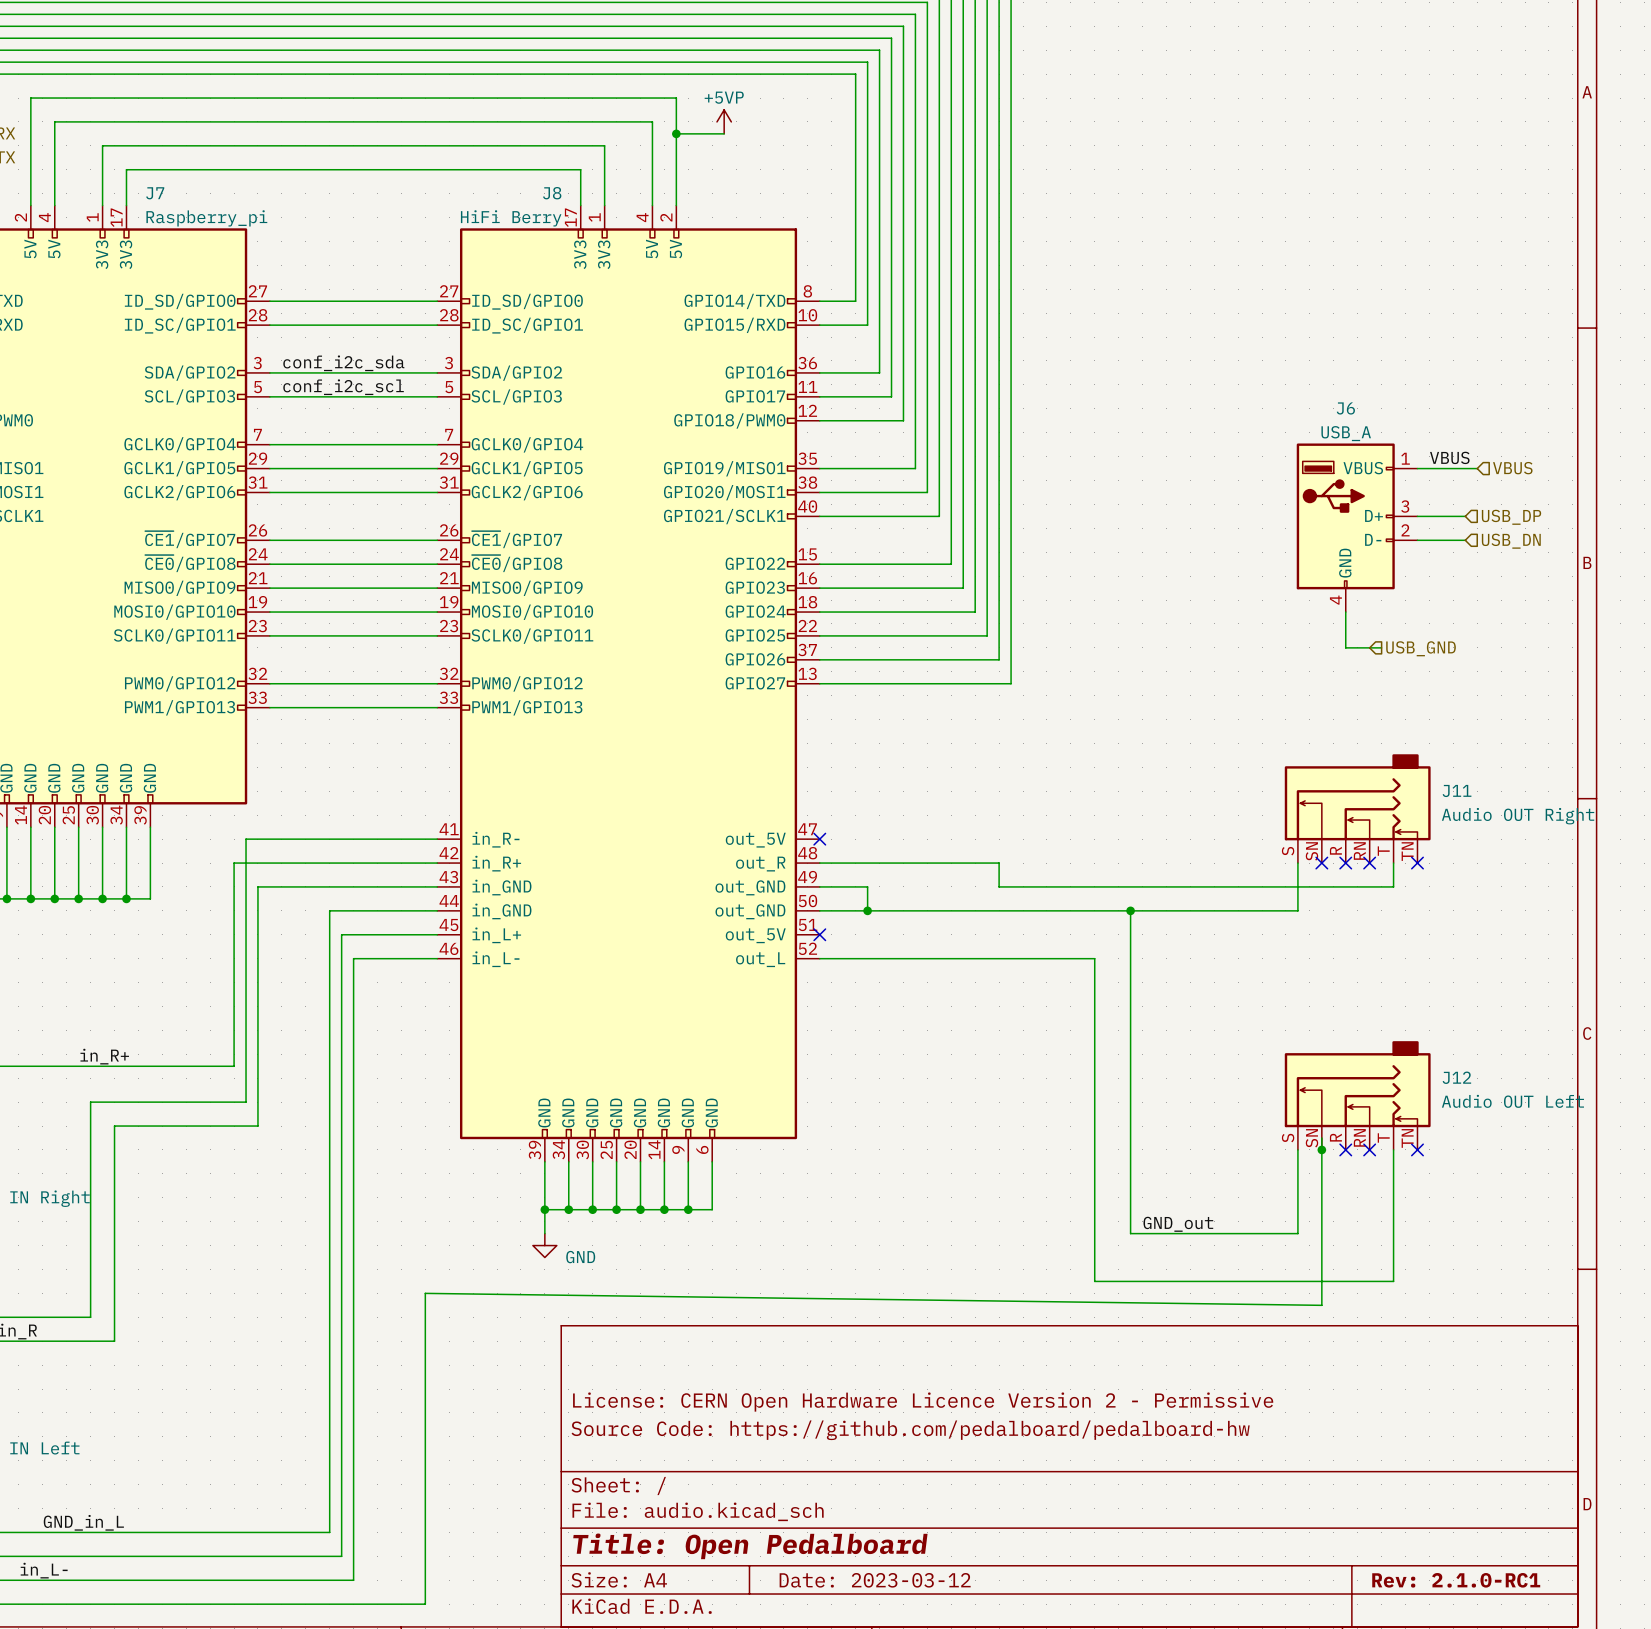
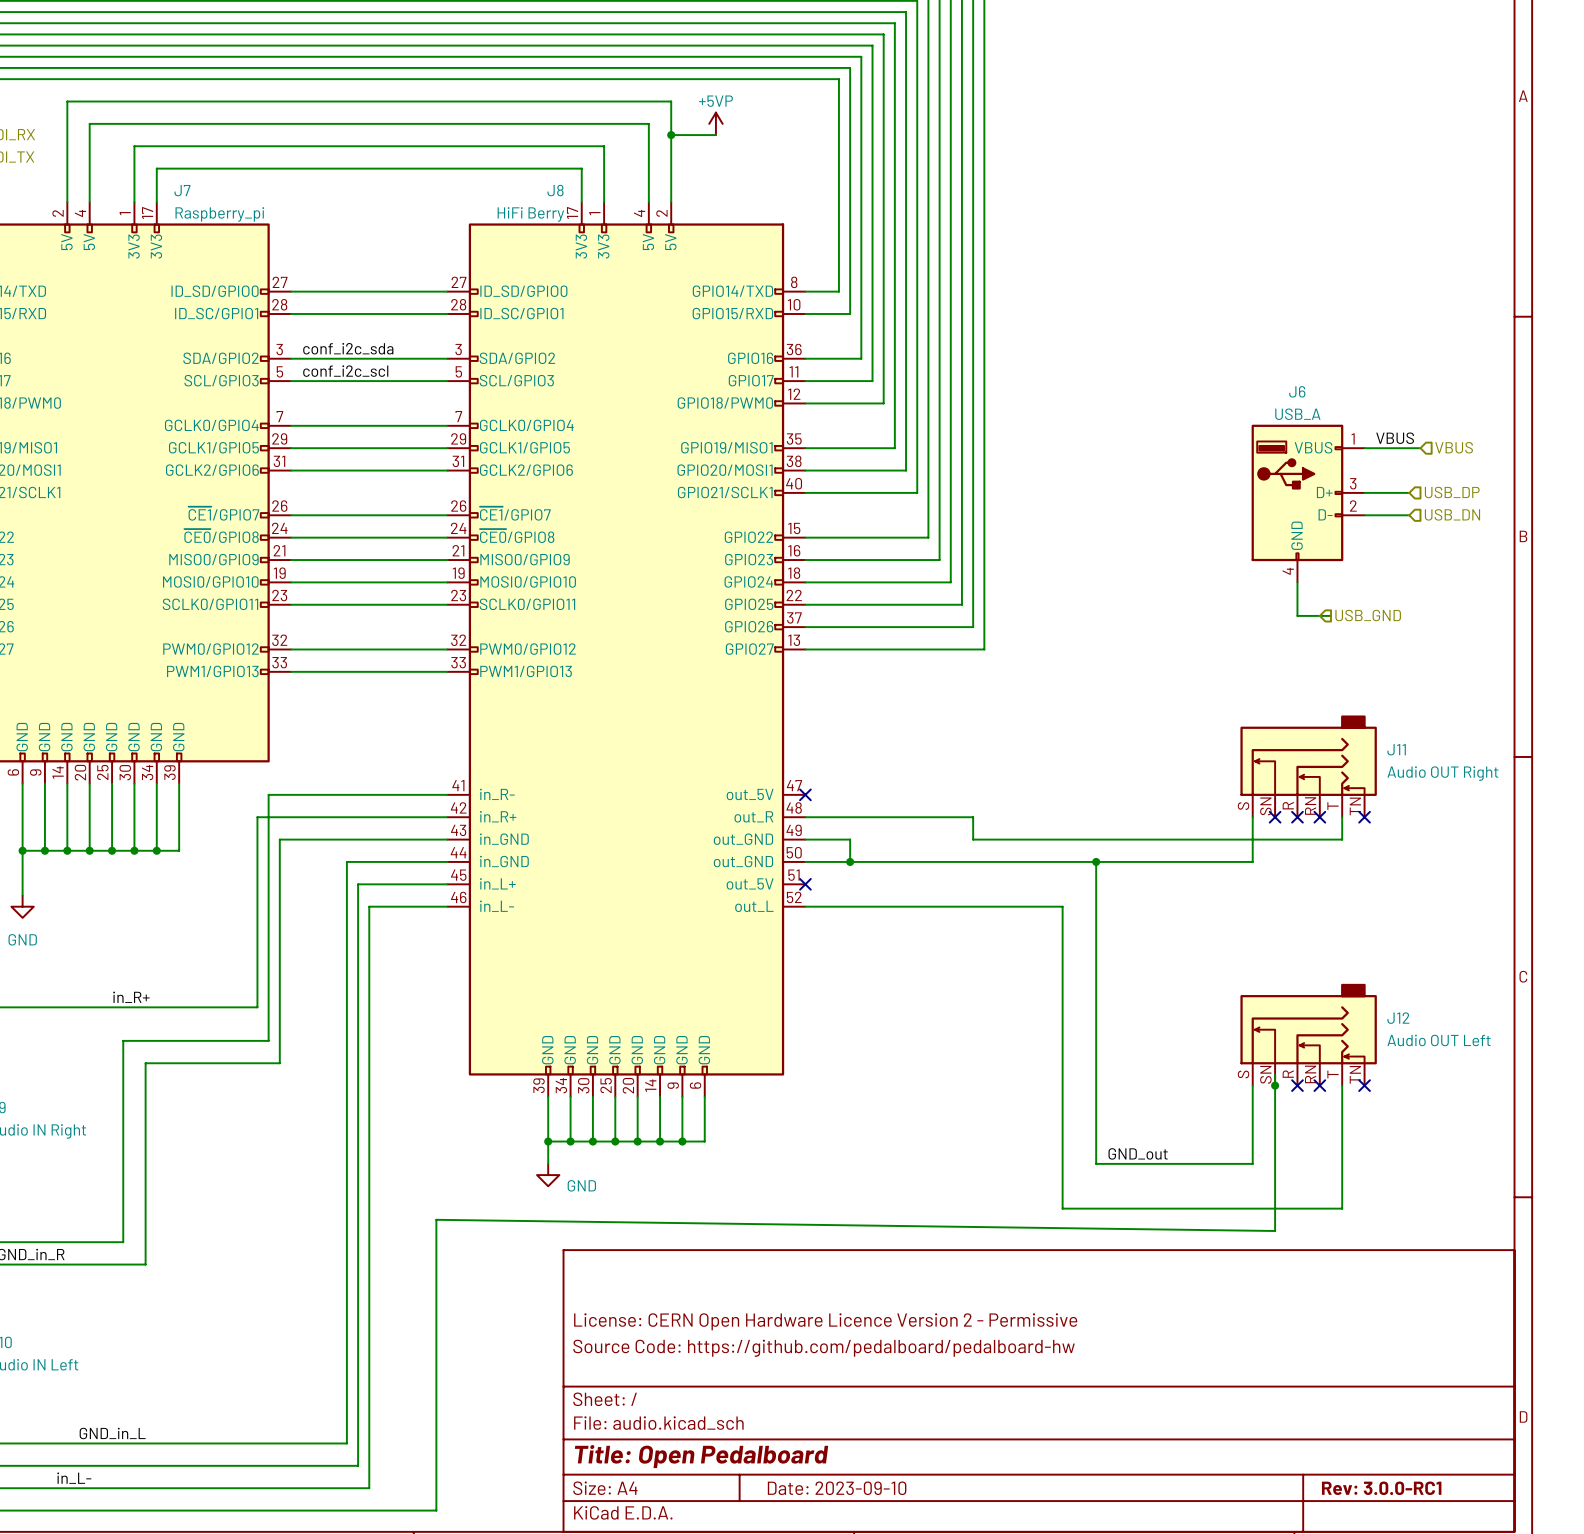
title block: Date: 2023-03-12 (875, 1580) -> Date: 2023-09-10 (837, 1488)
title block: Rev: 2.1.0-RC1 (1456, 1580) -> Rev: 3.0.0-RC1 (1381, 1488)

